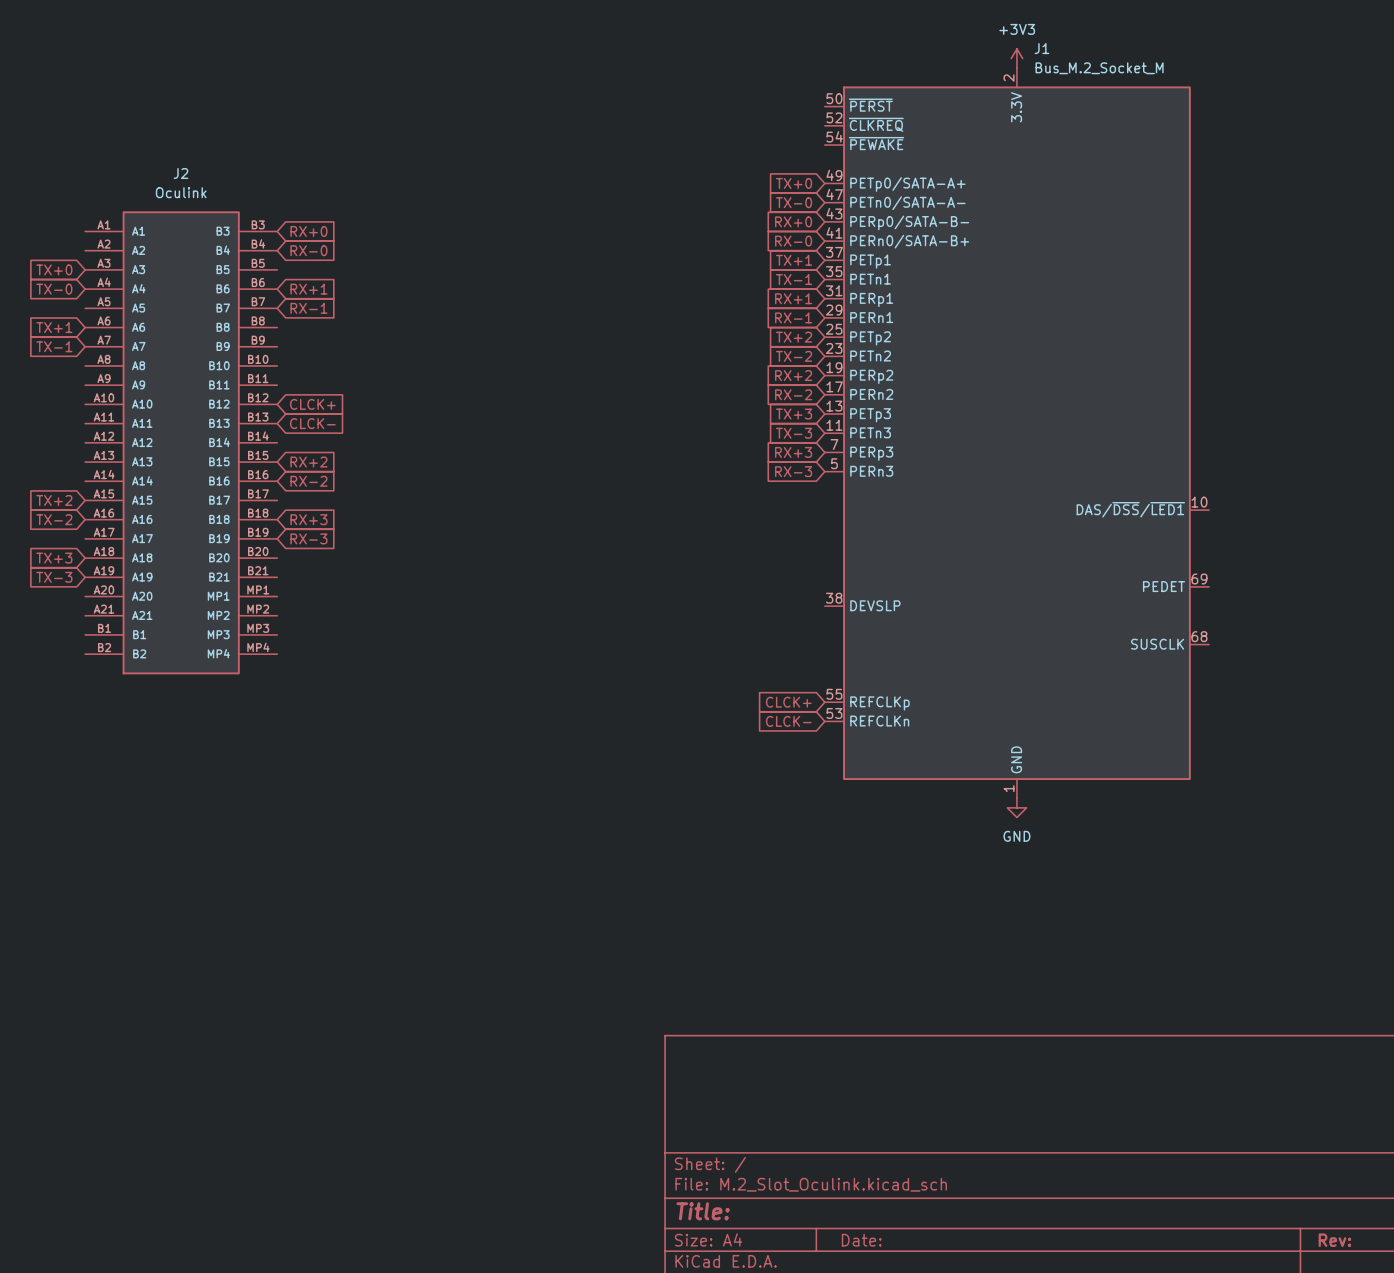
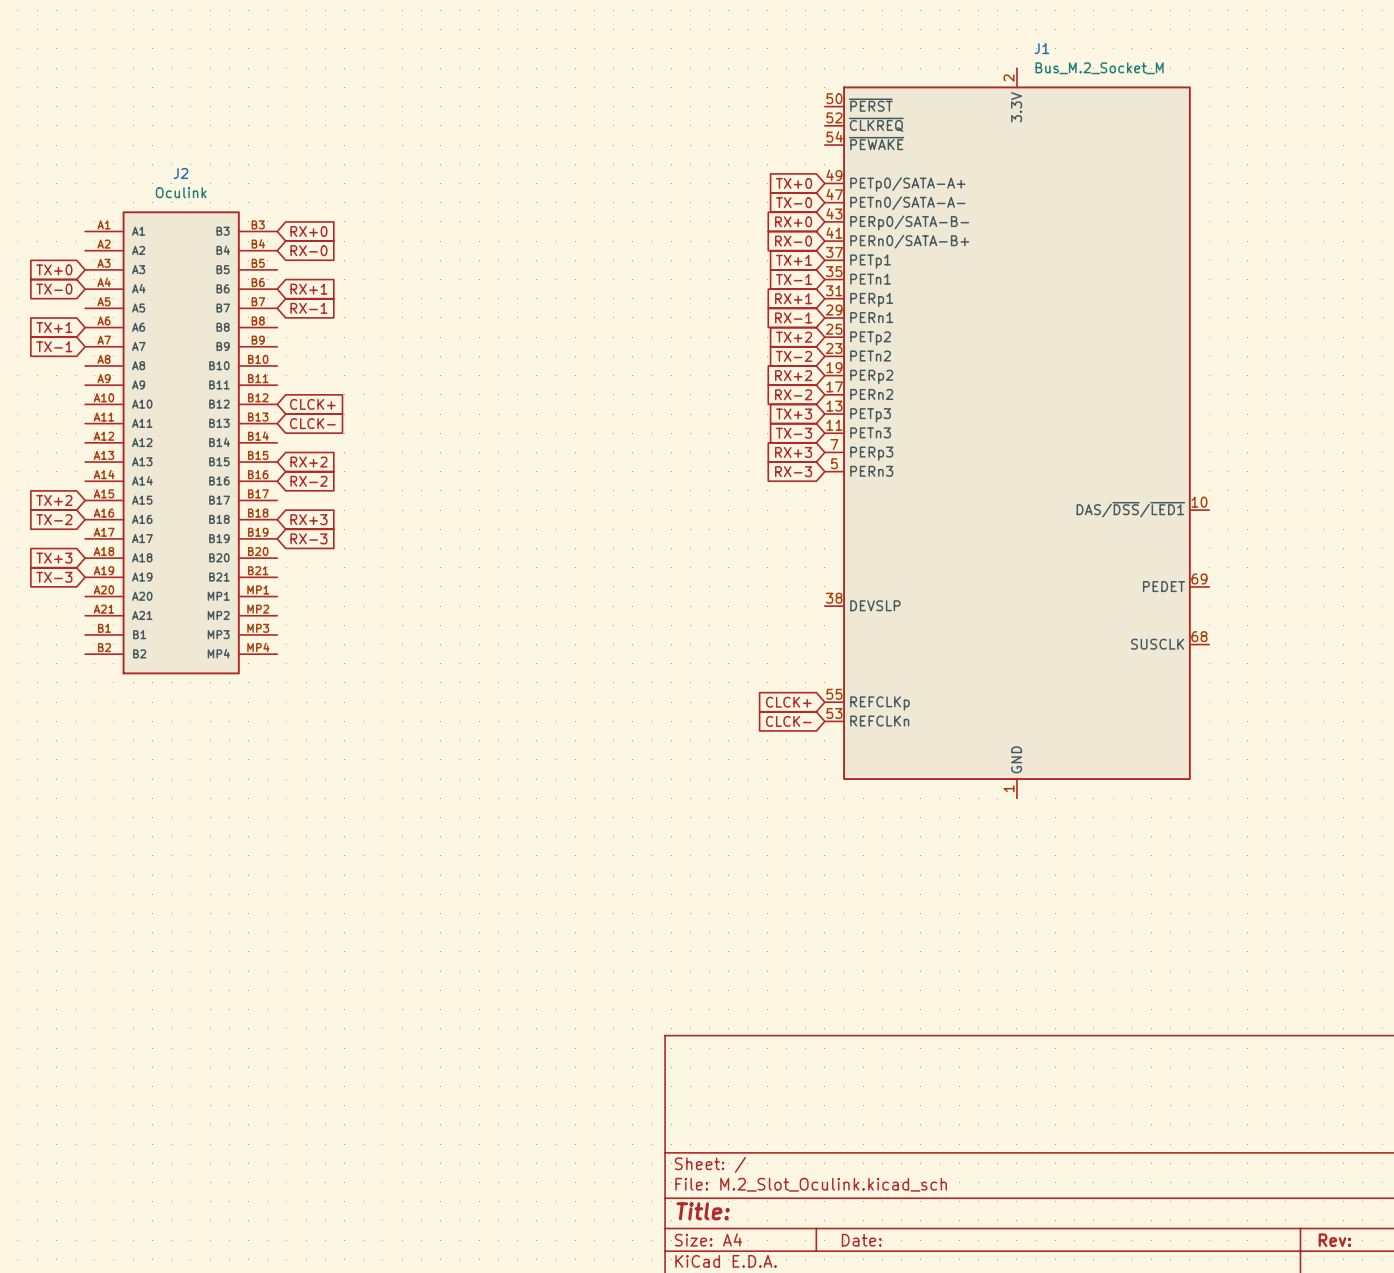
power symbol: +3V3 (1016, 58) -> none
power symbol: GND (1016, 807) -> none

